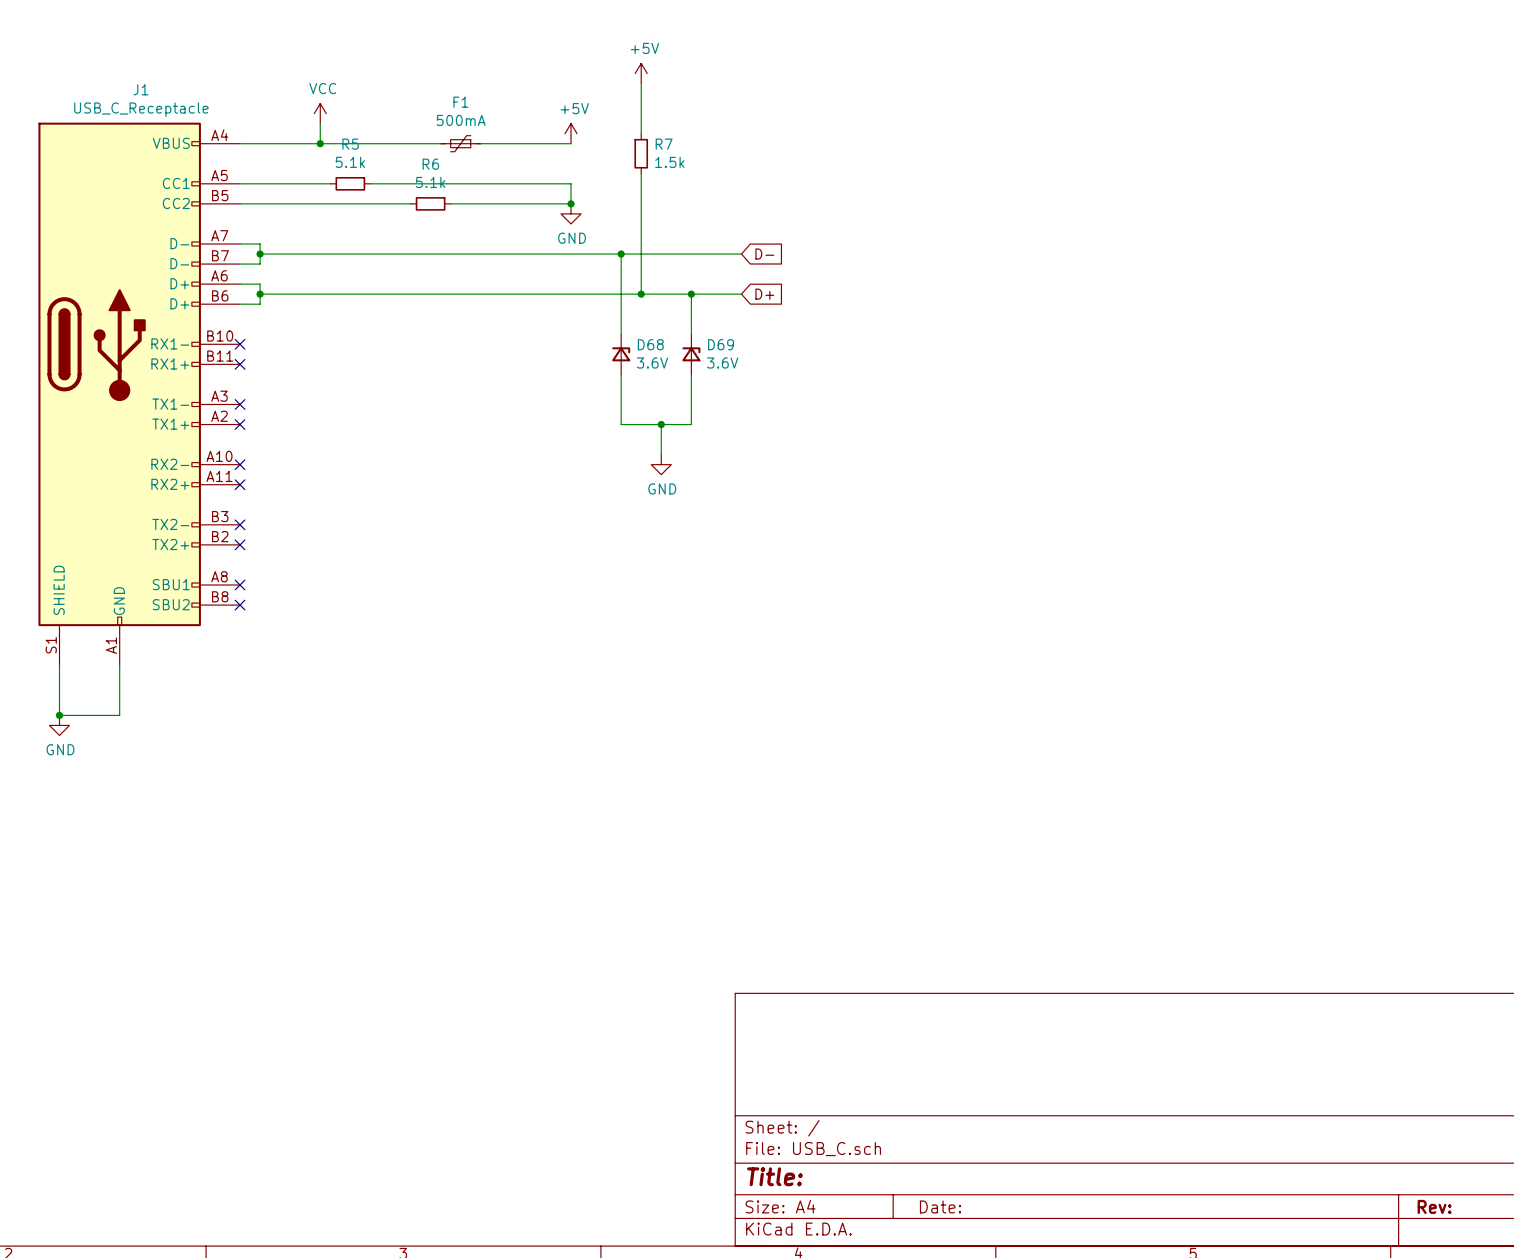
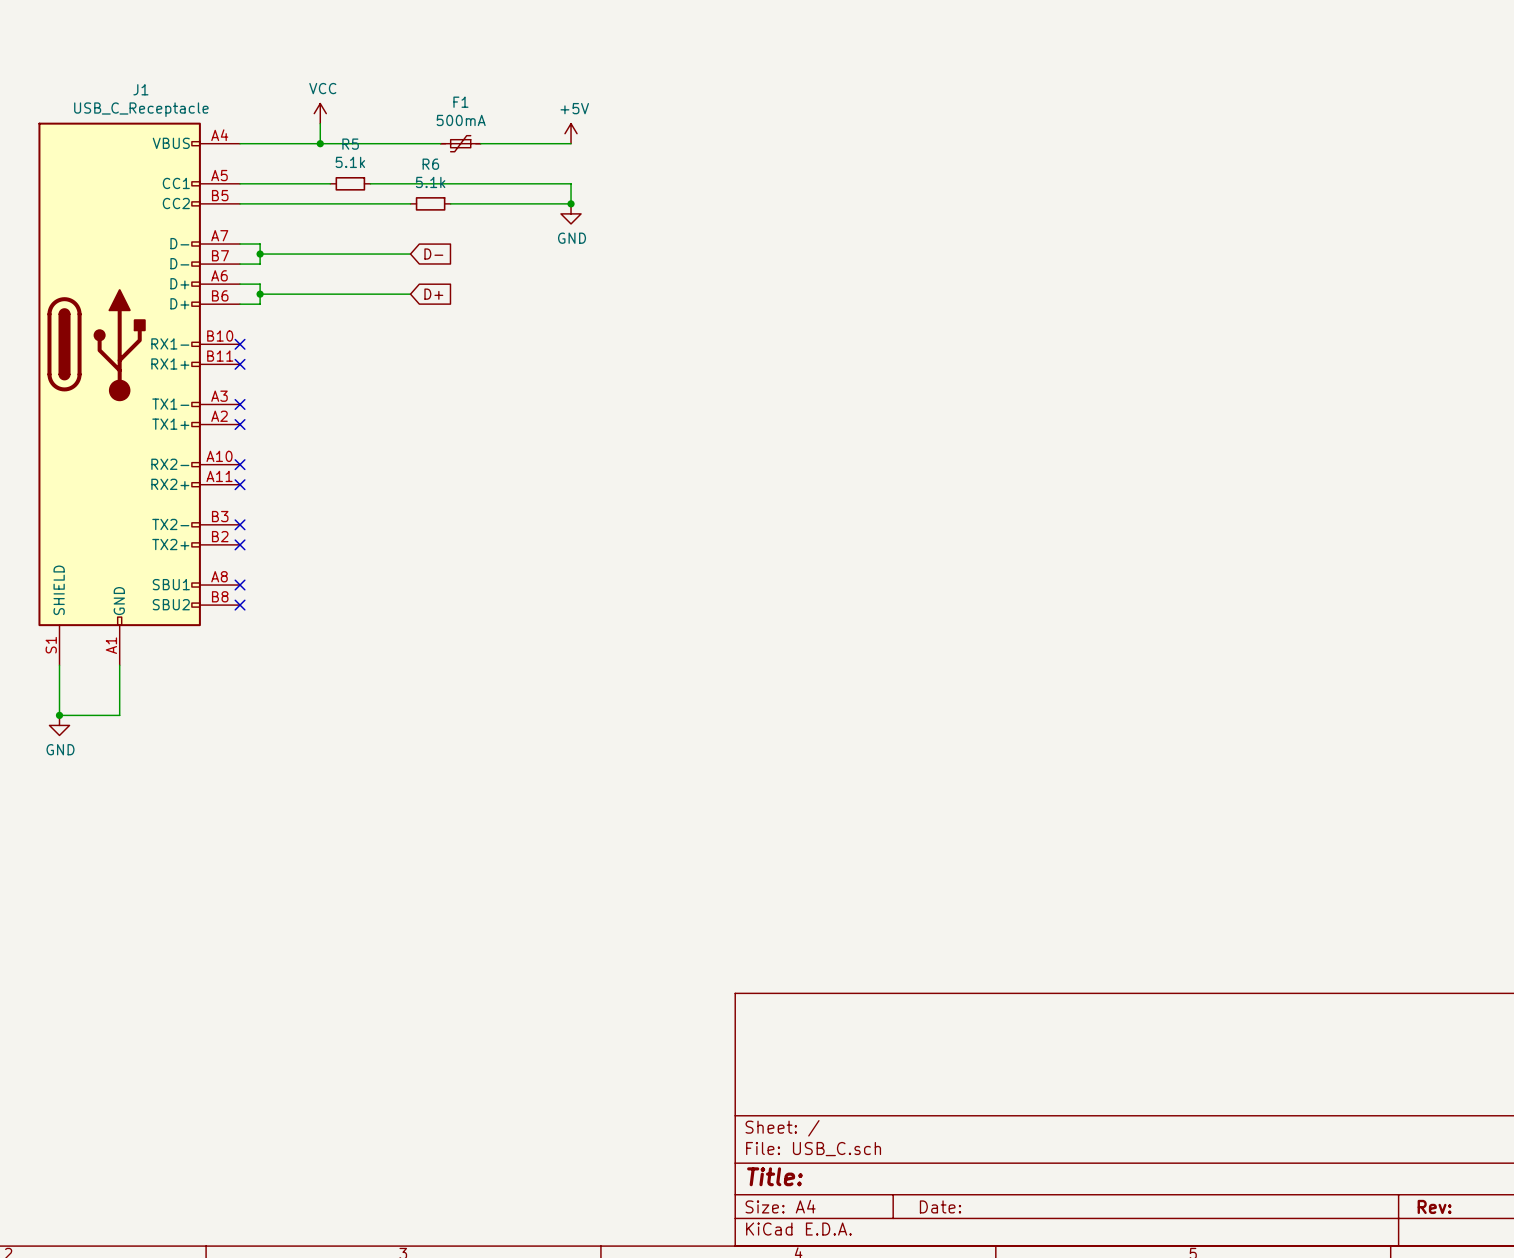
power symbol: +5V (641, 73) -> none
wire: (641, 83) (641, 133) -> none
R7: 1.5k (641, 153) -> none
wire: (641, 173) (641, 294) -> none
wire: (410, 254) (741, 254) -> none
global label: none -> D- (433, 254)
wire: (621, 254) (621, 334) -> none
junction: (621, 254) -> none
global label: D- (764, 254) -> none
wire: (410, 294) (741, 294) -> none
global label: none -> D+ (433, 294)
junction: (641, 294) -> none
wire: (691, 294) (691, 334) -> none
junction: (691, 294) -> none
global label: D+ (764, 294) -> none
D68: 3.6V (621, 354) -> none
D69: 3.6V (691, 354) -> none
wire: (621, 374) (621, 424) (691, 424) (691, 374) -> none
wire: (661, 424) (661, 454) -> none
junction: (661, 424) -> none
power symbol: GND (661, 464) -> none

